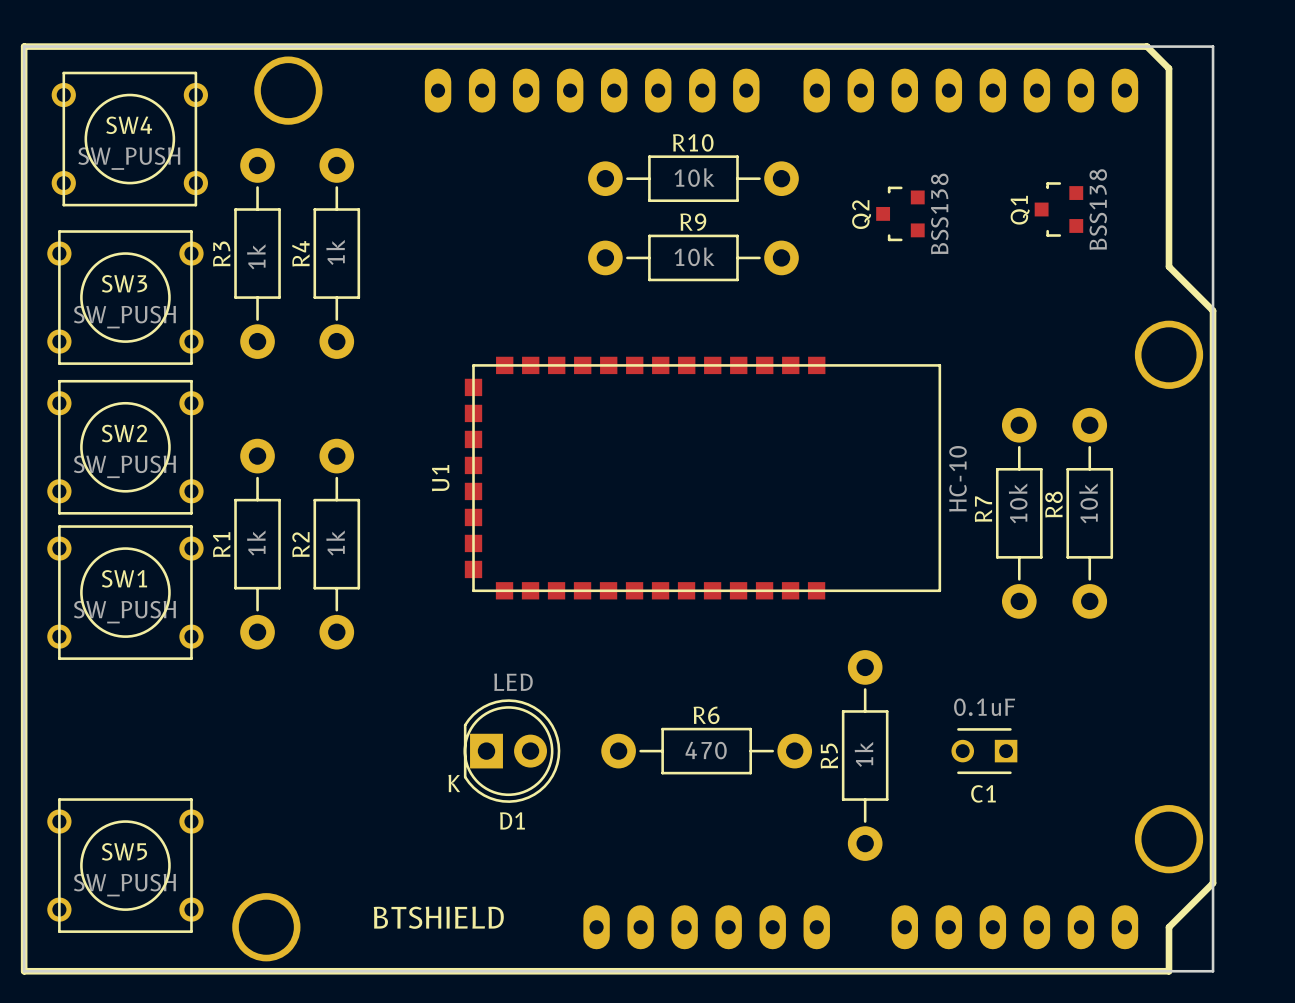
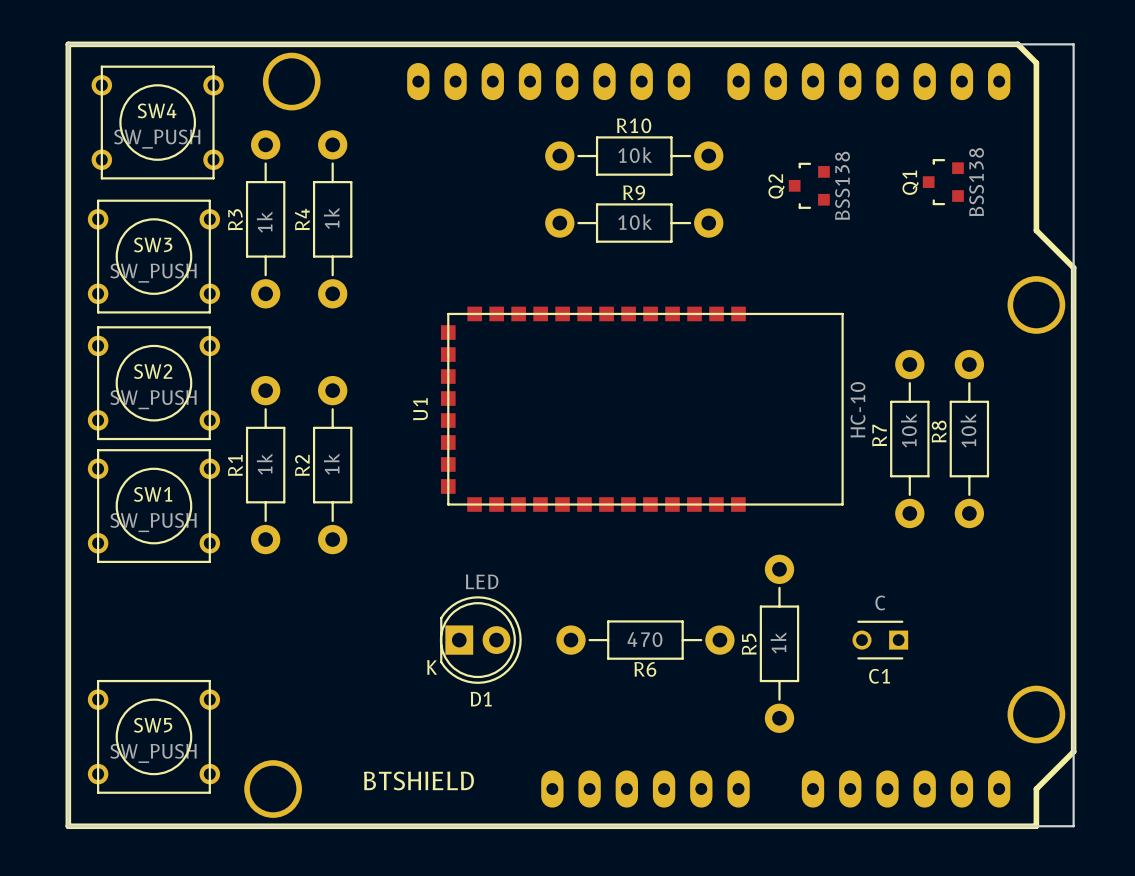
C1 value: 0.1uF (984, 707) -> C (880, 602)
R6 name position: R6 (706, 715) -> R6 (645, 669)

